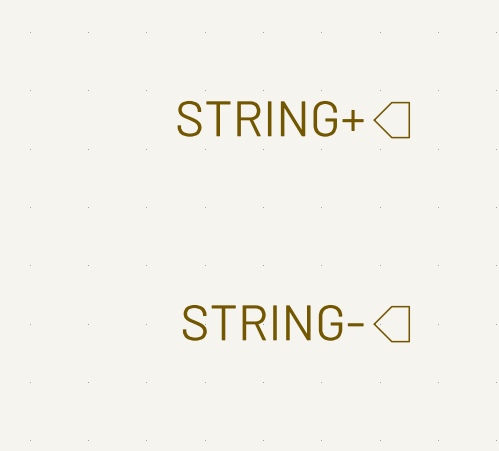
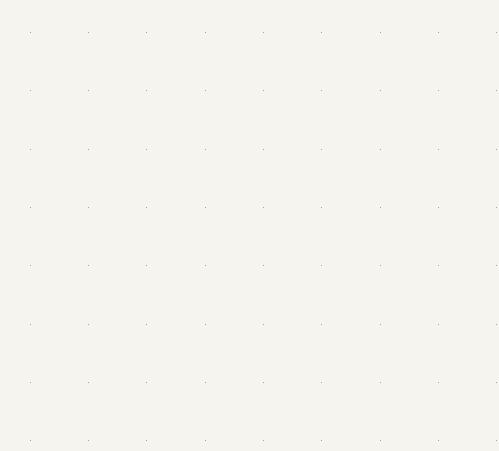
hierarchical label: STRING+ (270, 118) -> none
hierarchical label: STRING- (273, 322) -> none

